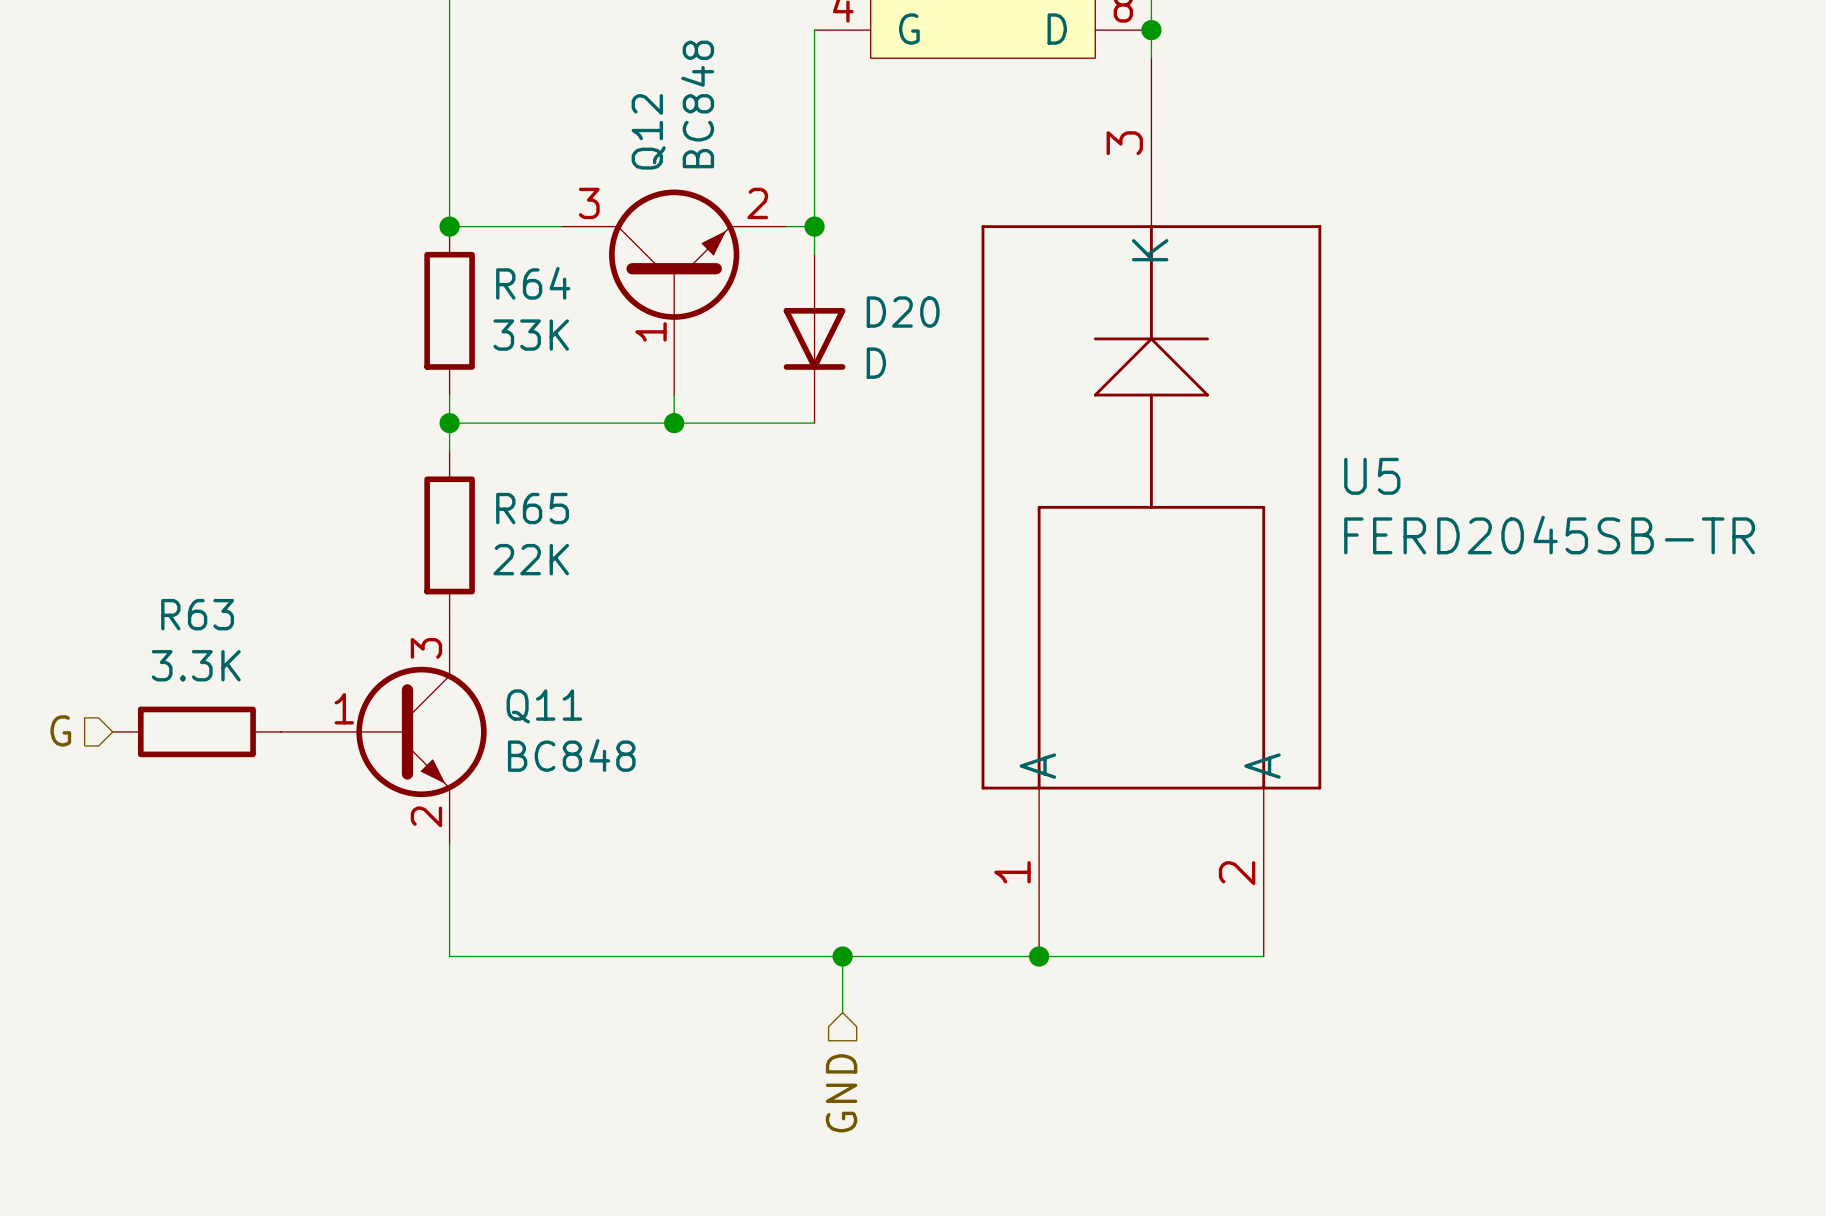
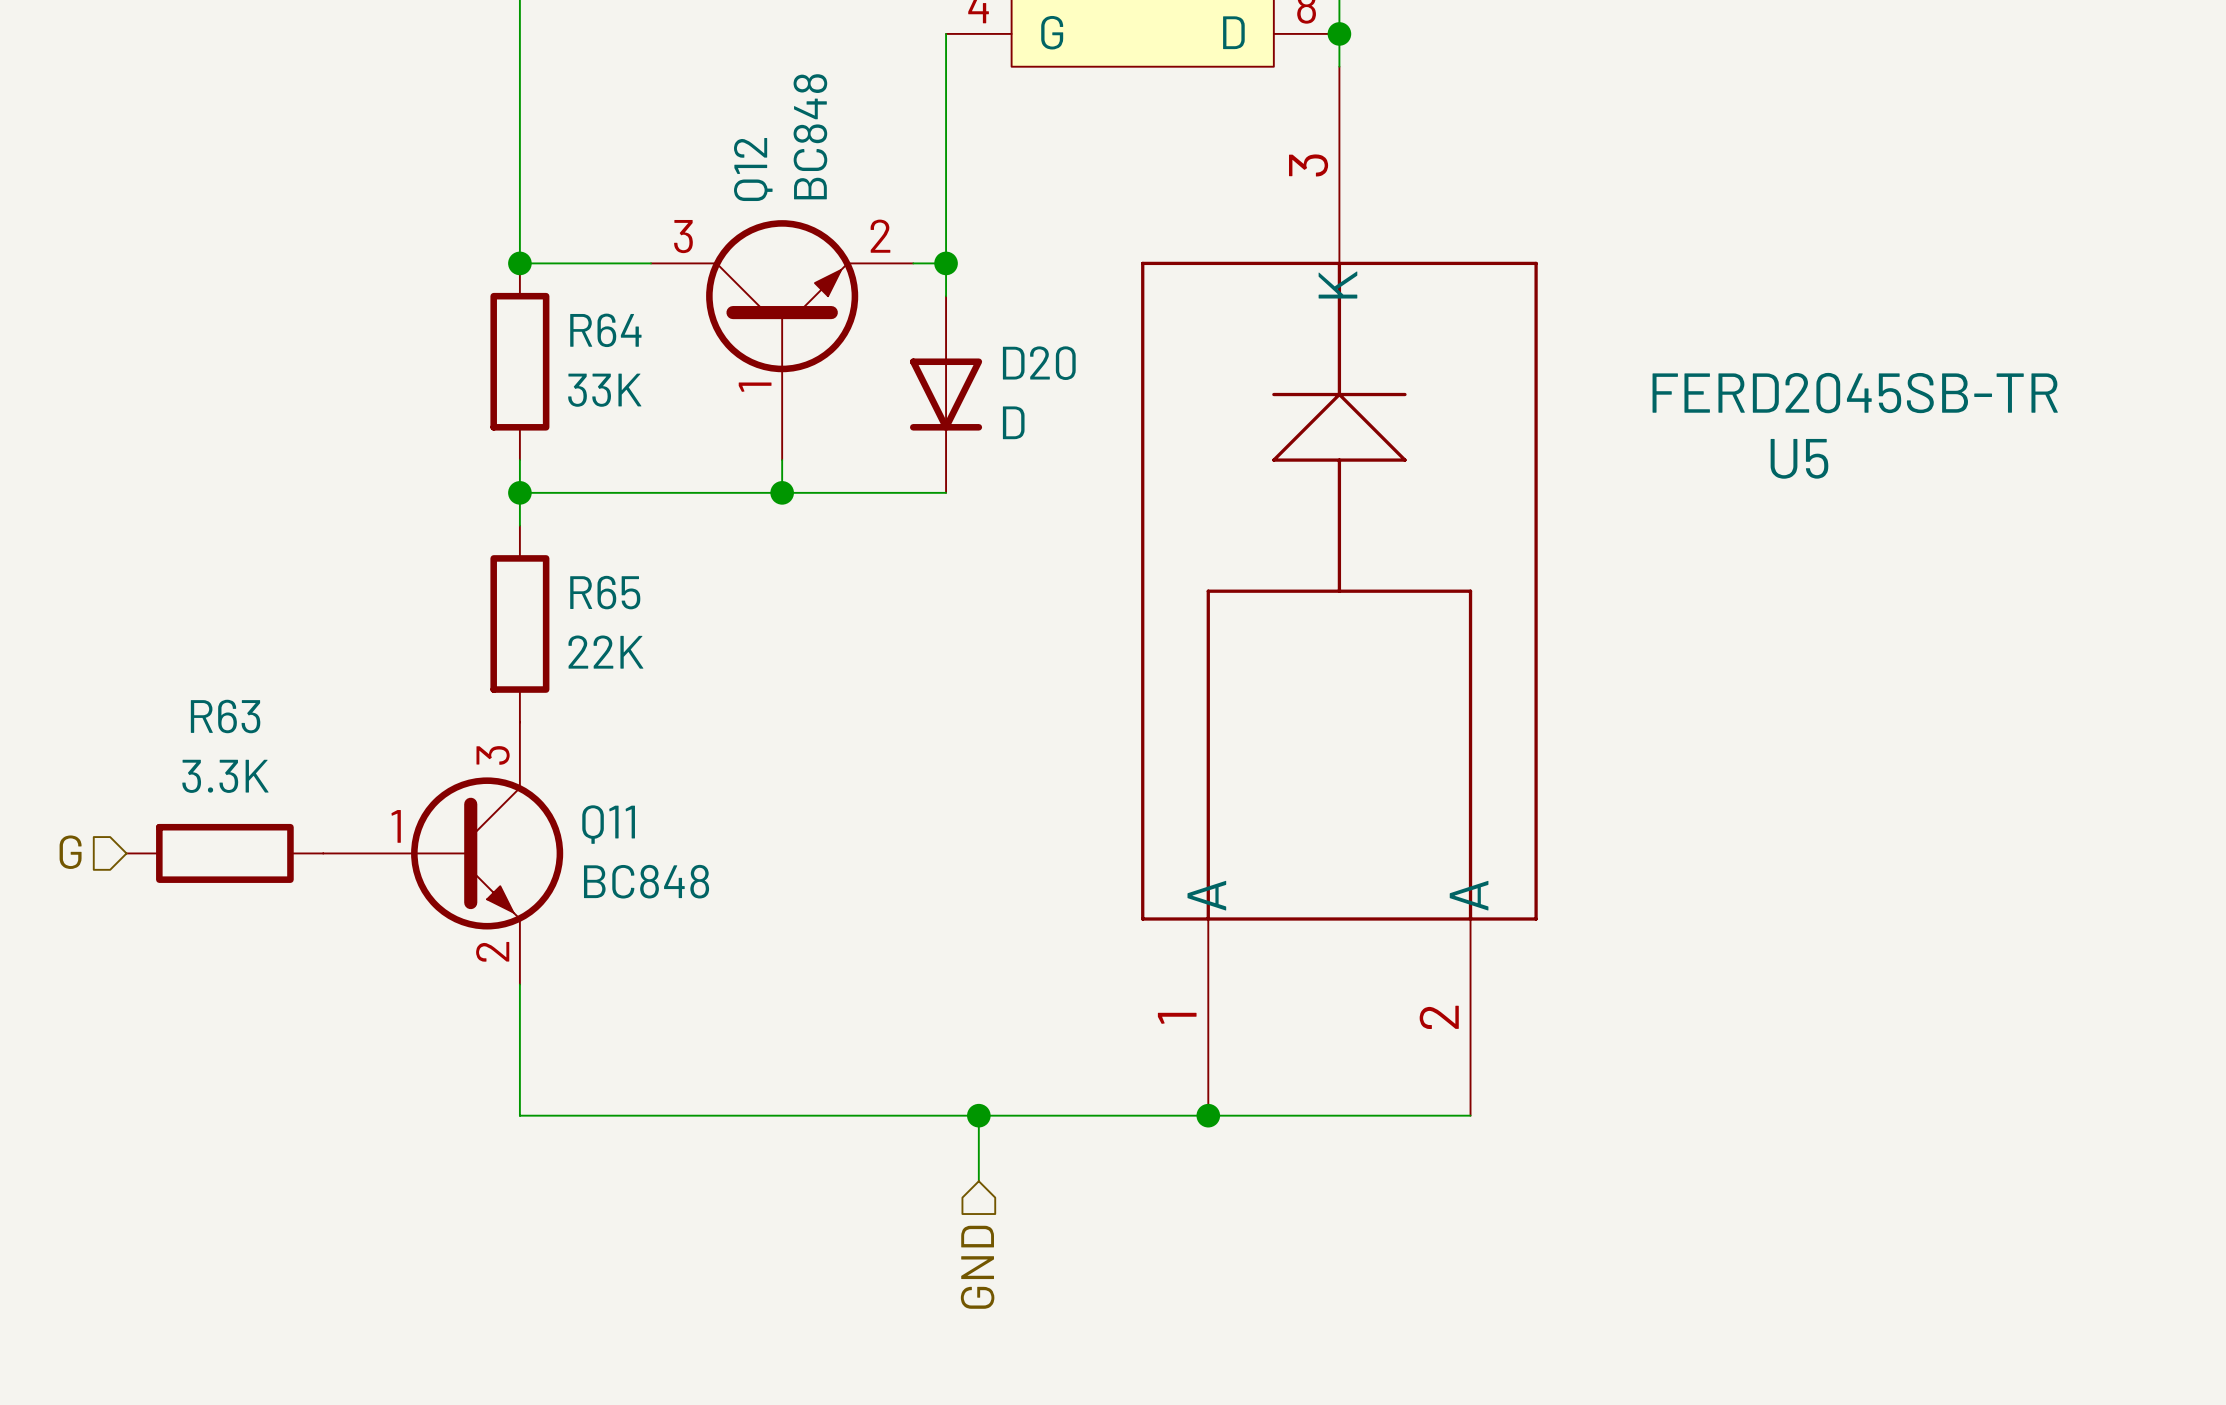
U5 name position: U5 (1372, 476) -> U5 (1799, 458)
U5 value position: FERD2045SB-TR (1549, 535) -> FERD2045SB-TR (1855, 393)

